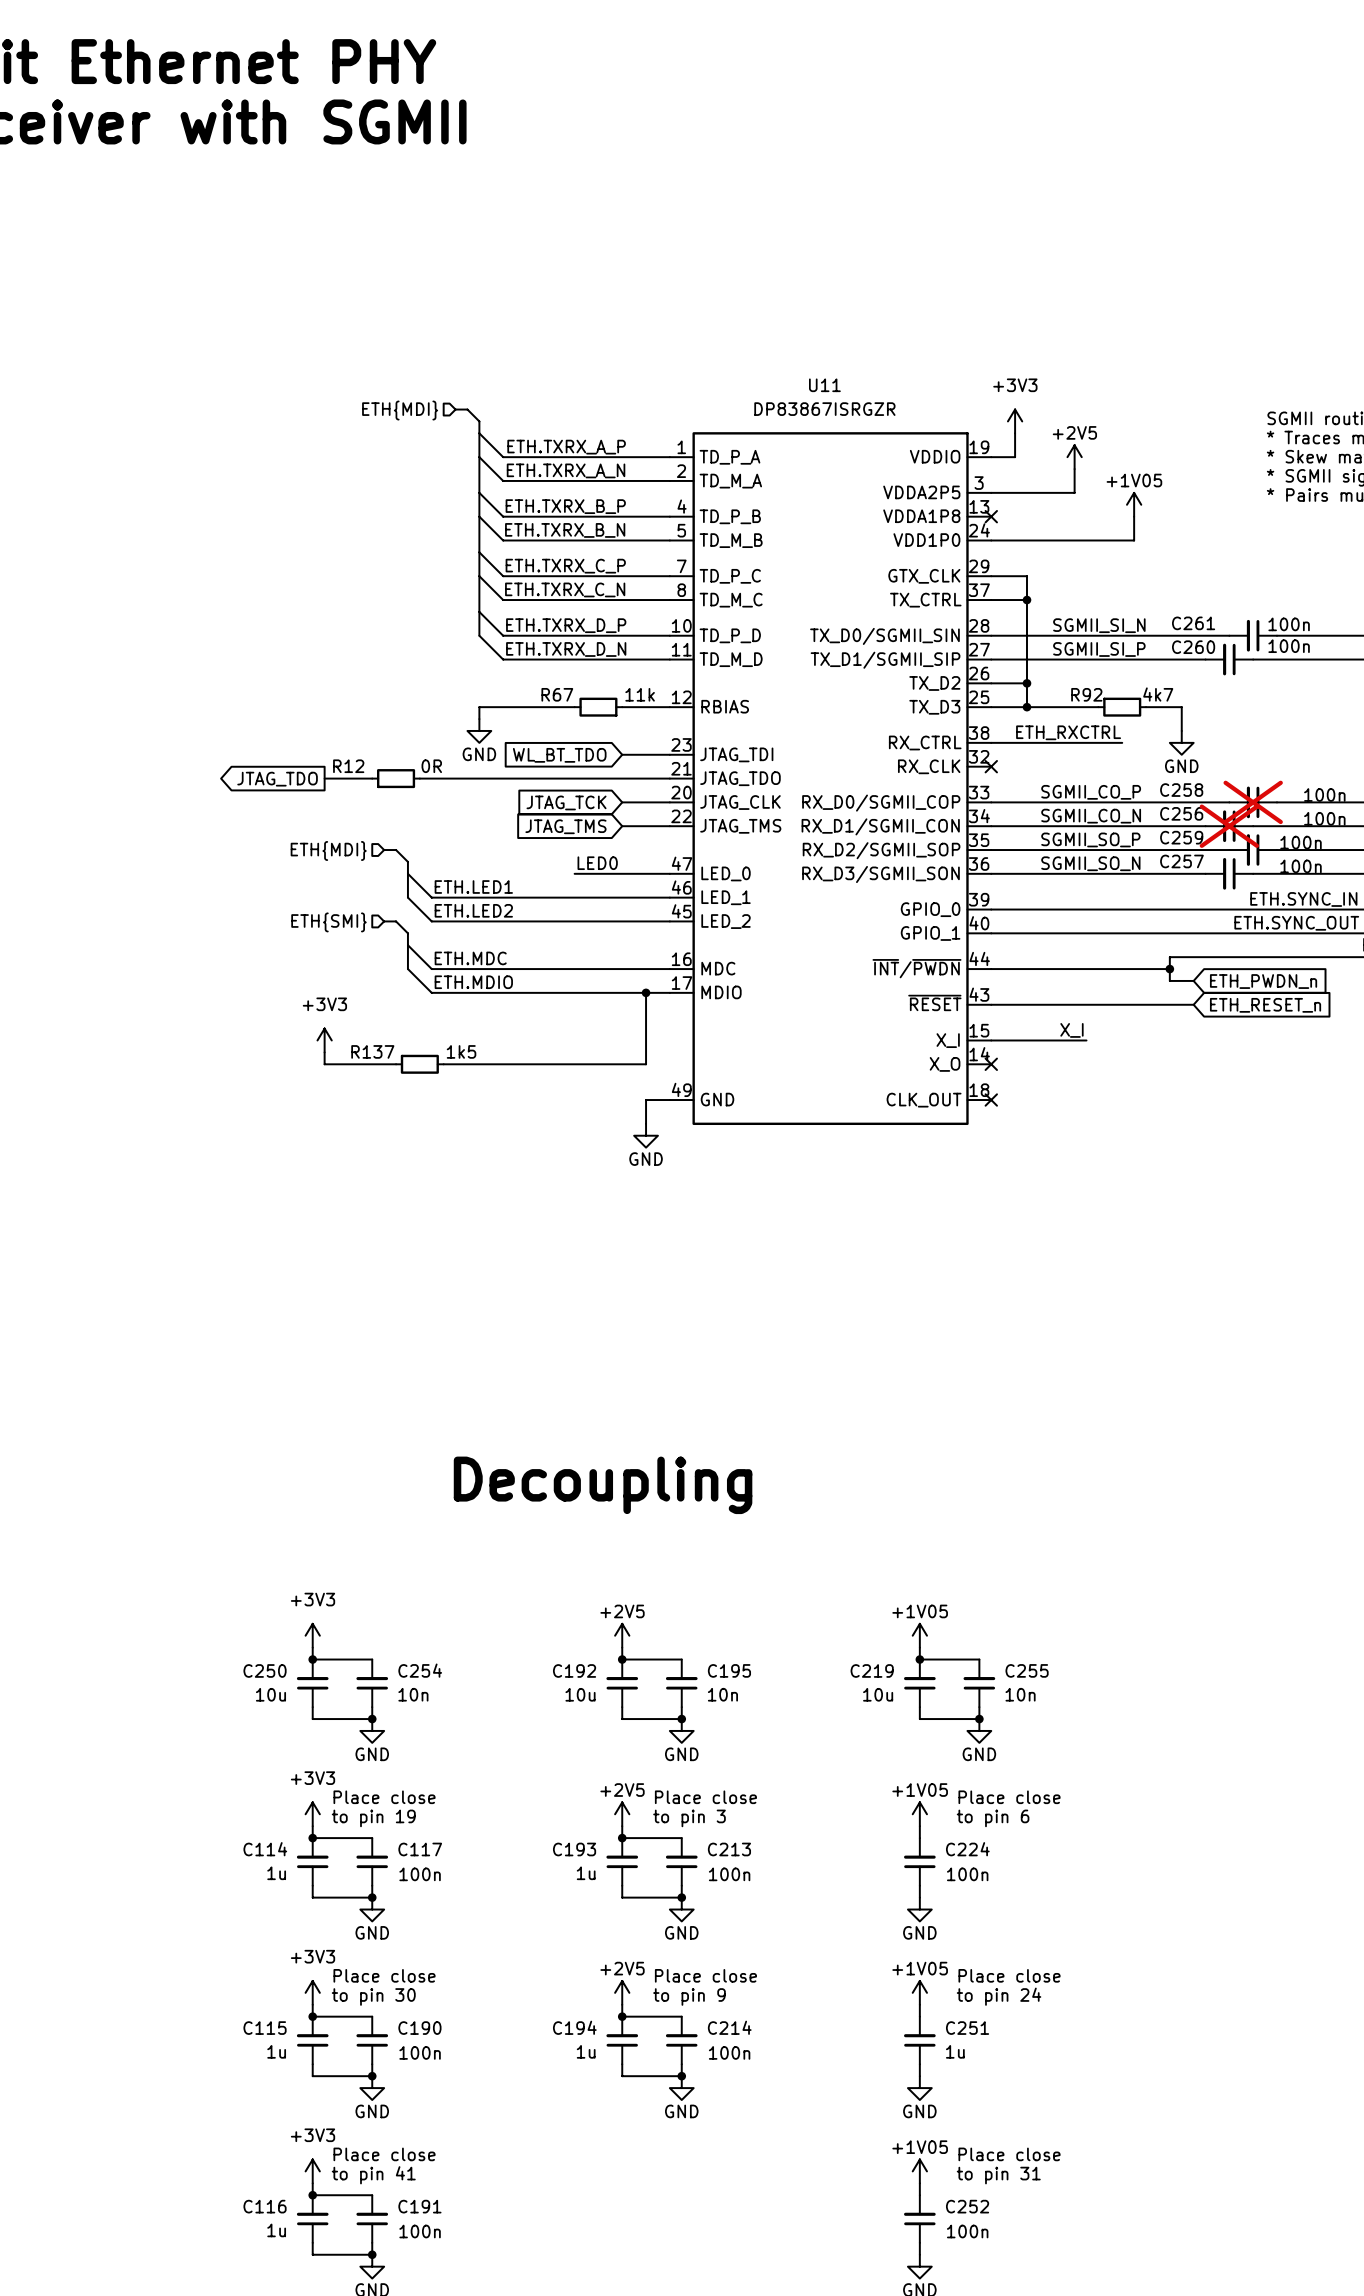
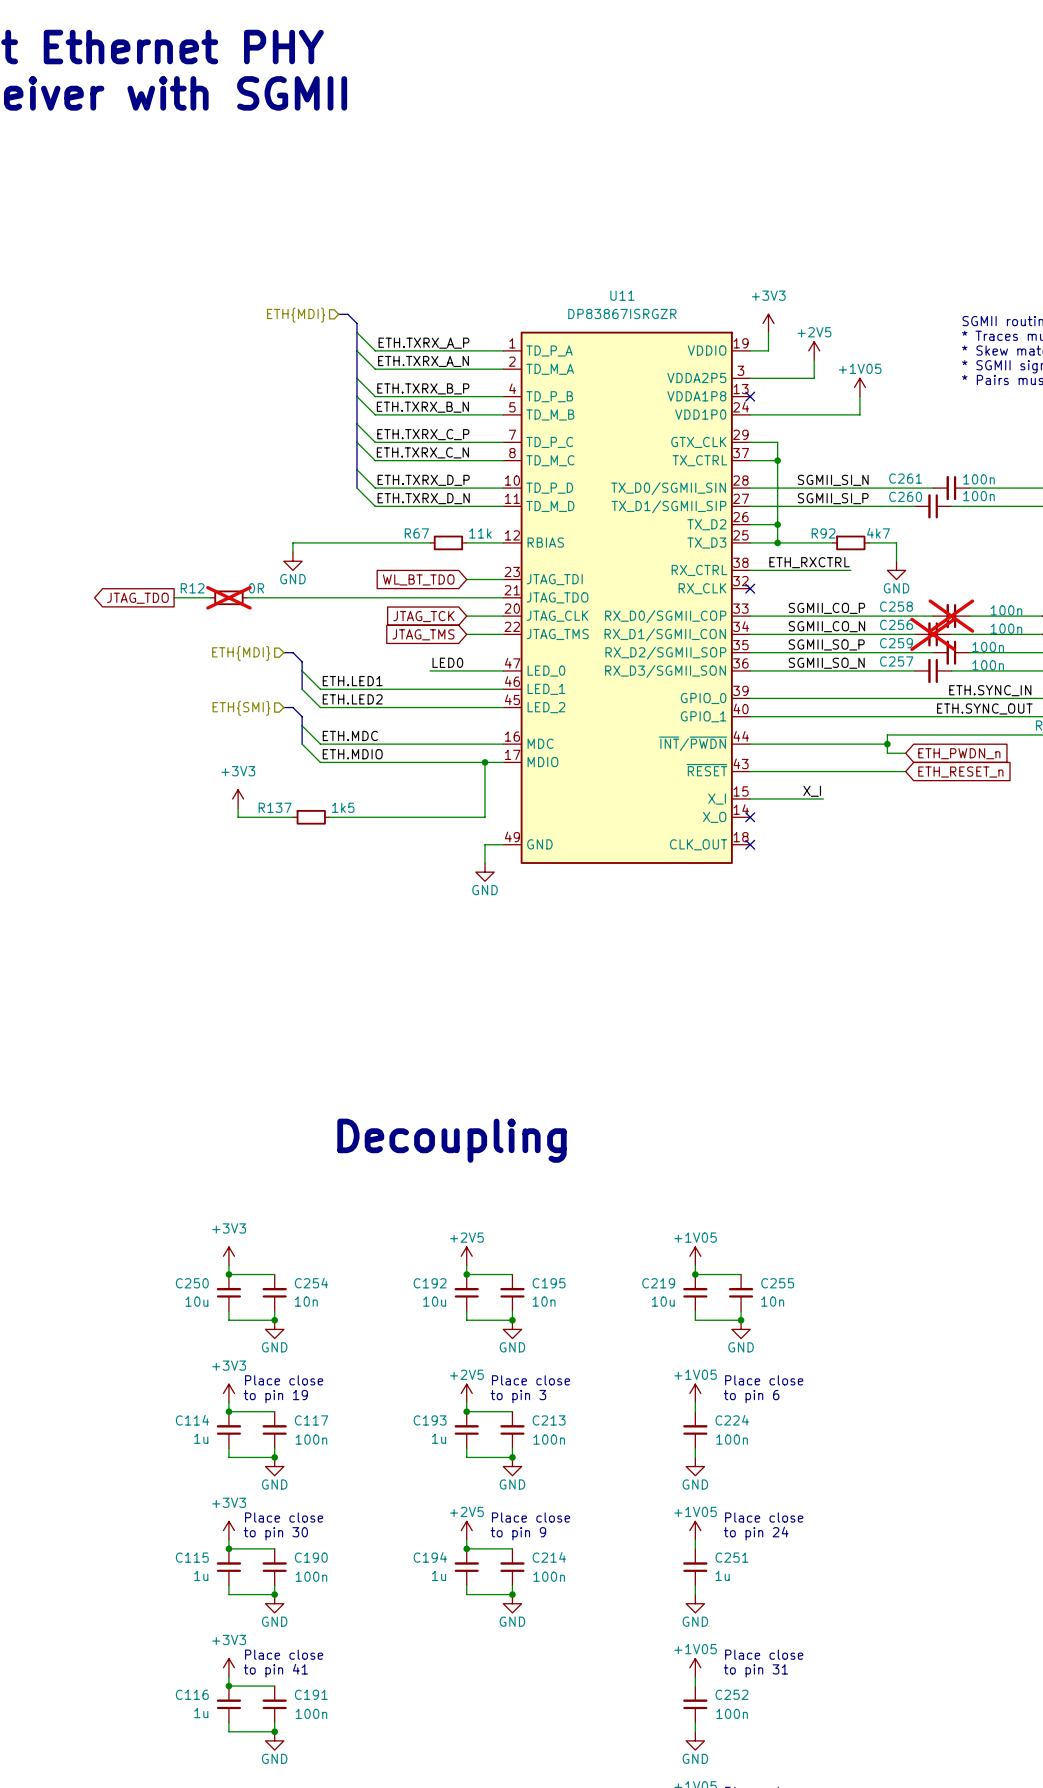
wire: (479, 707) (479, 719) -> (356, 542) (292, 542) (292, 552)
power symbol position: GND (479, 730) -> GND (292, 561)
wire: none -> (174, 597) (210, 597)
R12 do-not-place cross: none -> (228, 597)
wire: none -> (274, 597) (311, 597)
R12 position: (396, 778) -> (228, 597)
global label position: JTAG_TDO (277, 779) -> JTAG_TDO (137, 598)

